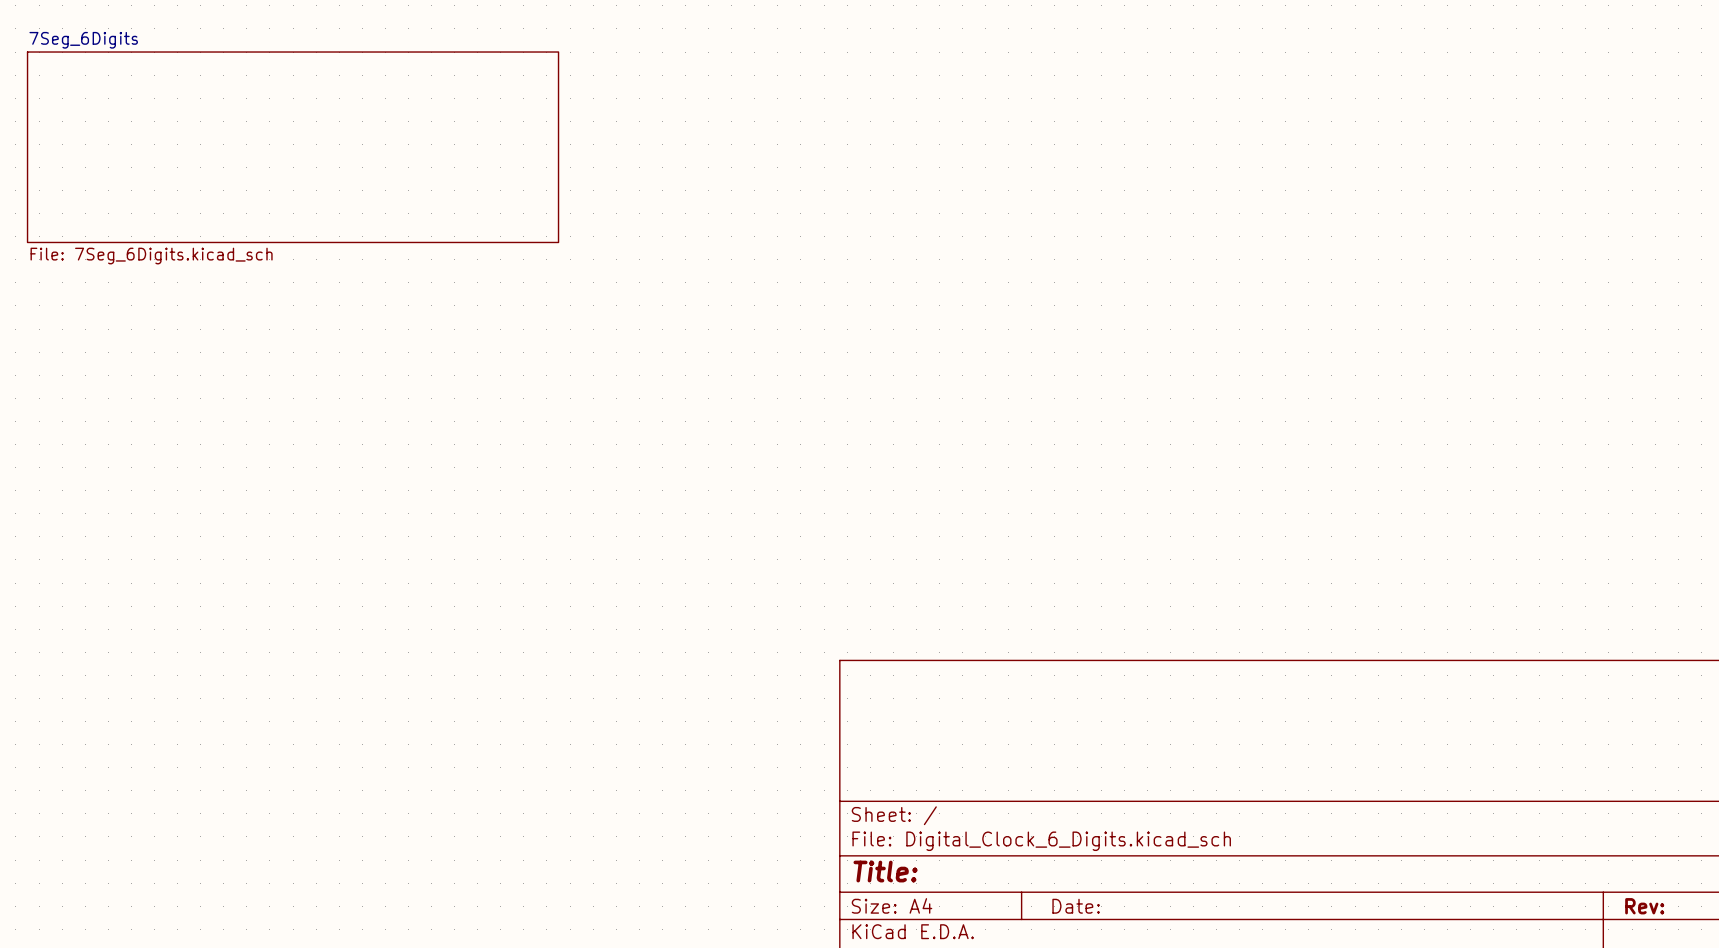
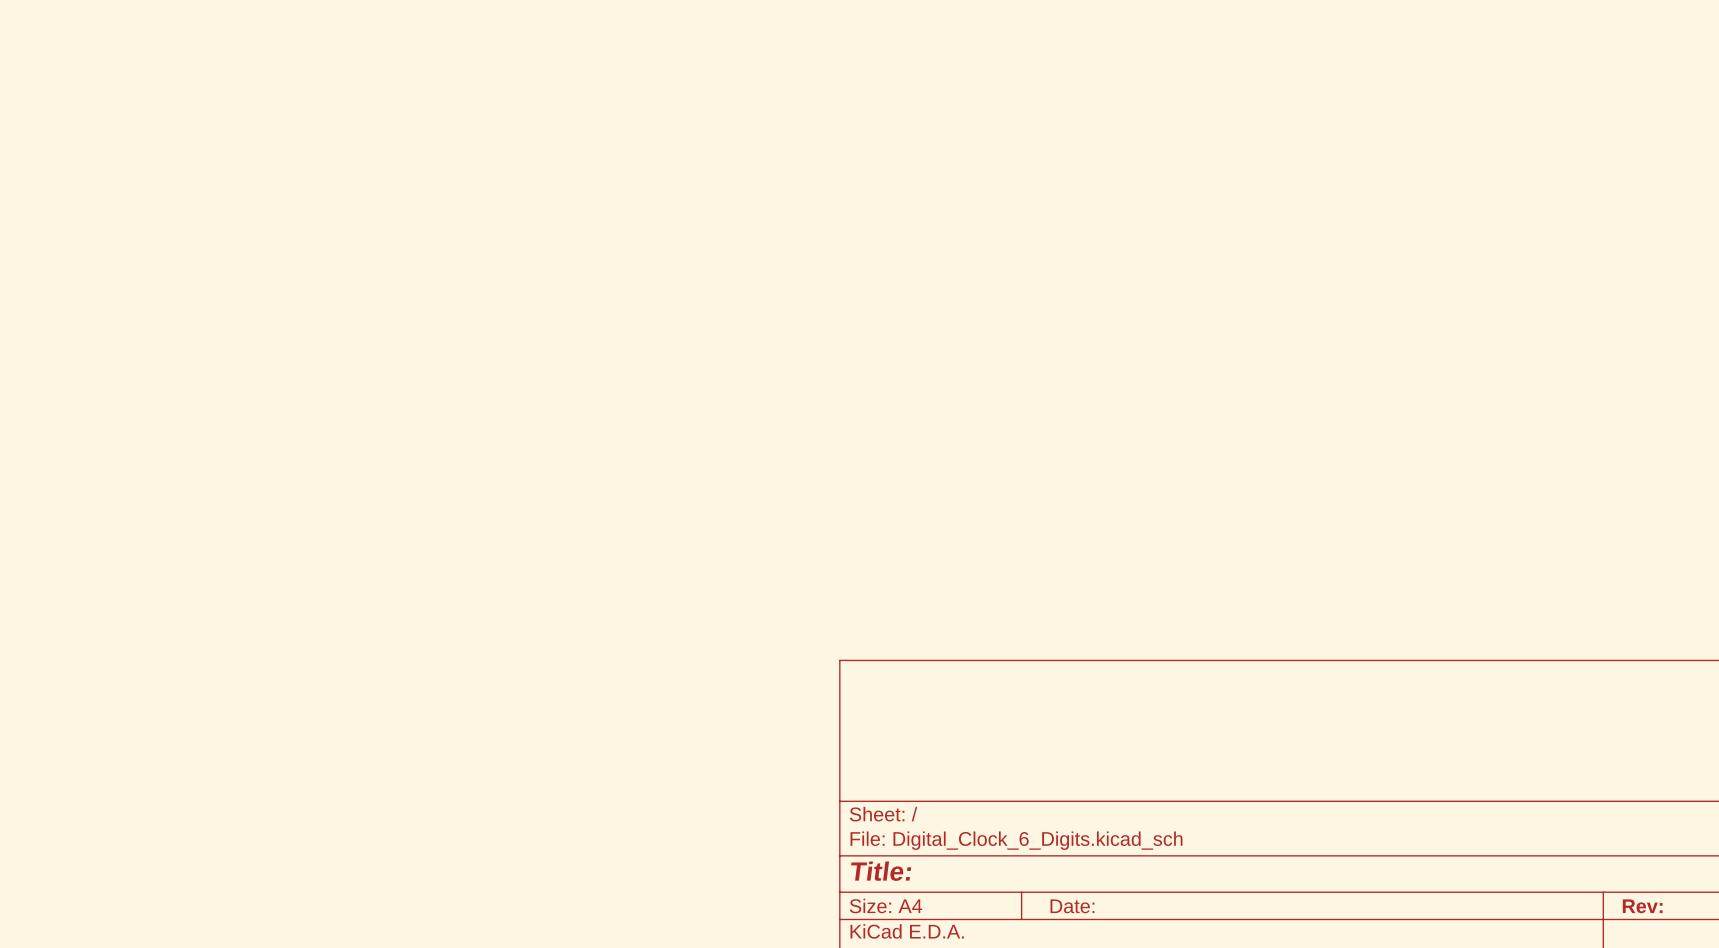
sheet 7Seg_6Digits: File: 7Seg_6Digits.kicad_sch (293, 147) -> none

